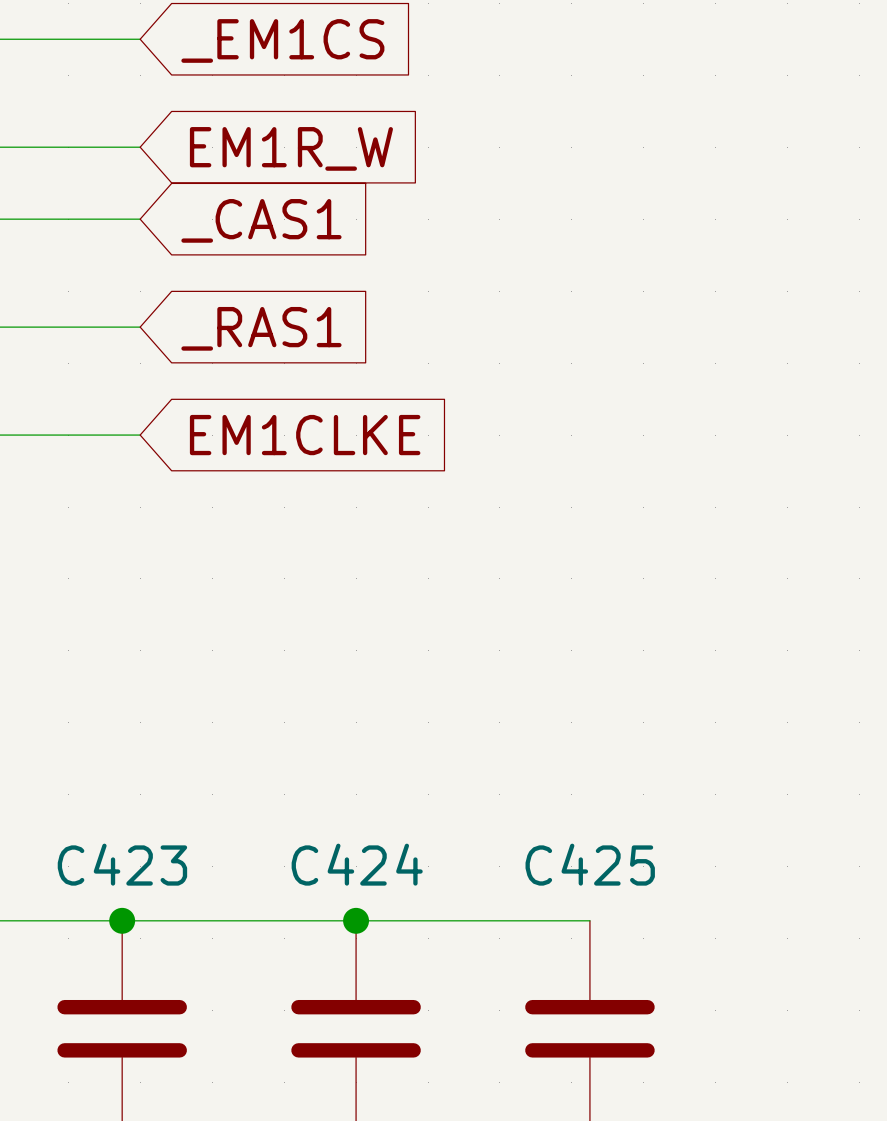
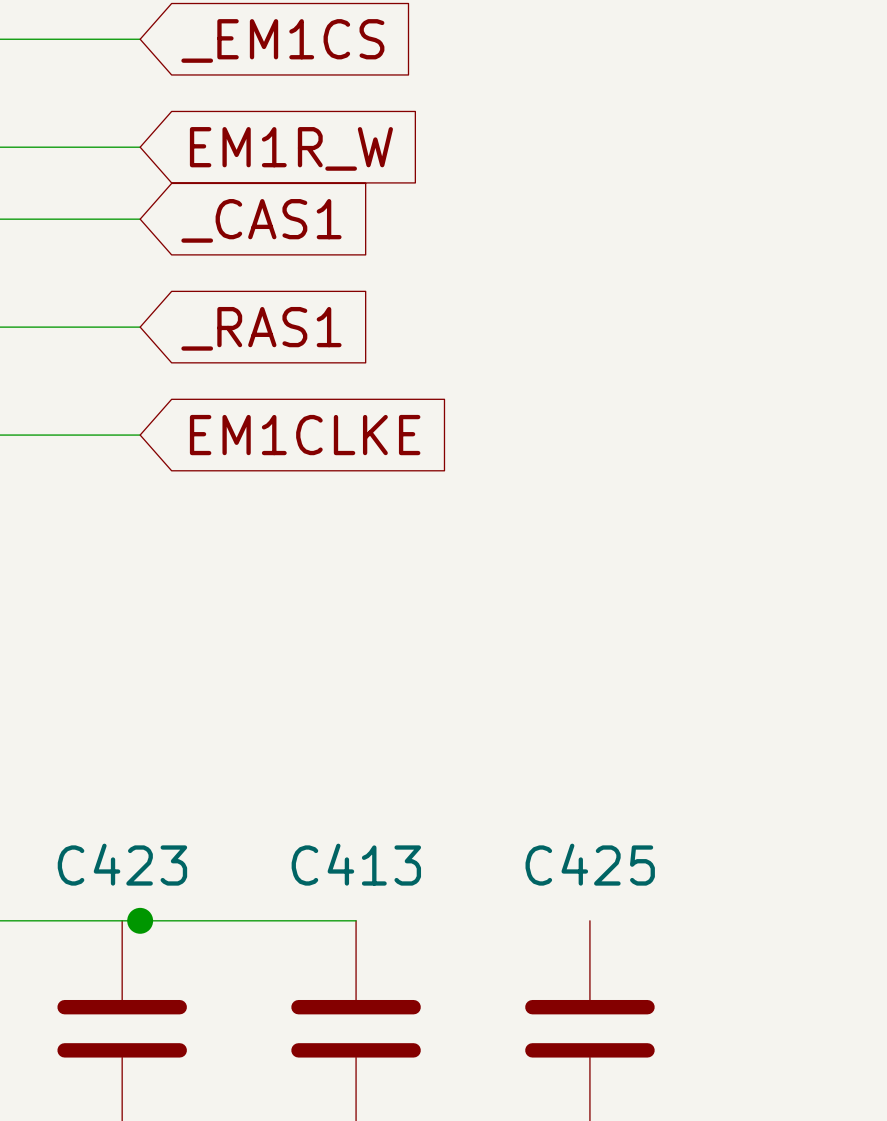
C424 name: C424 (357, 864) -> C413 (356, 864)
junction position: (122, 920) -> (140, 920)
wire: (356, 920) (589, 920) -> none
junction: (356, 920) -> none

